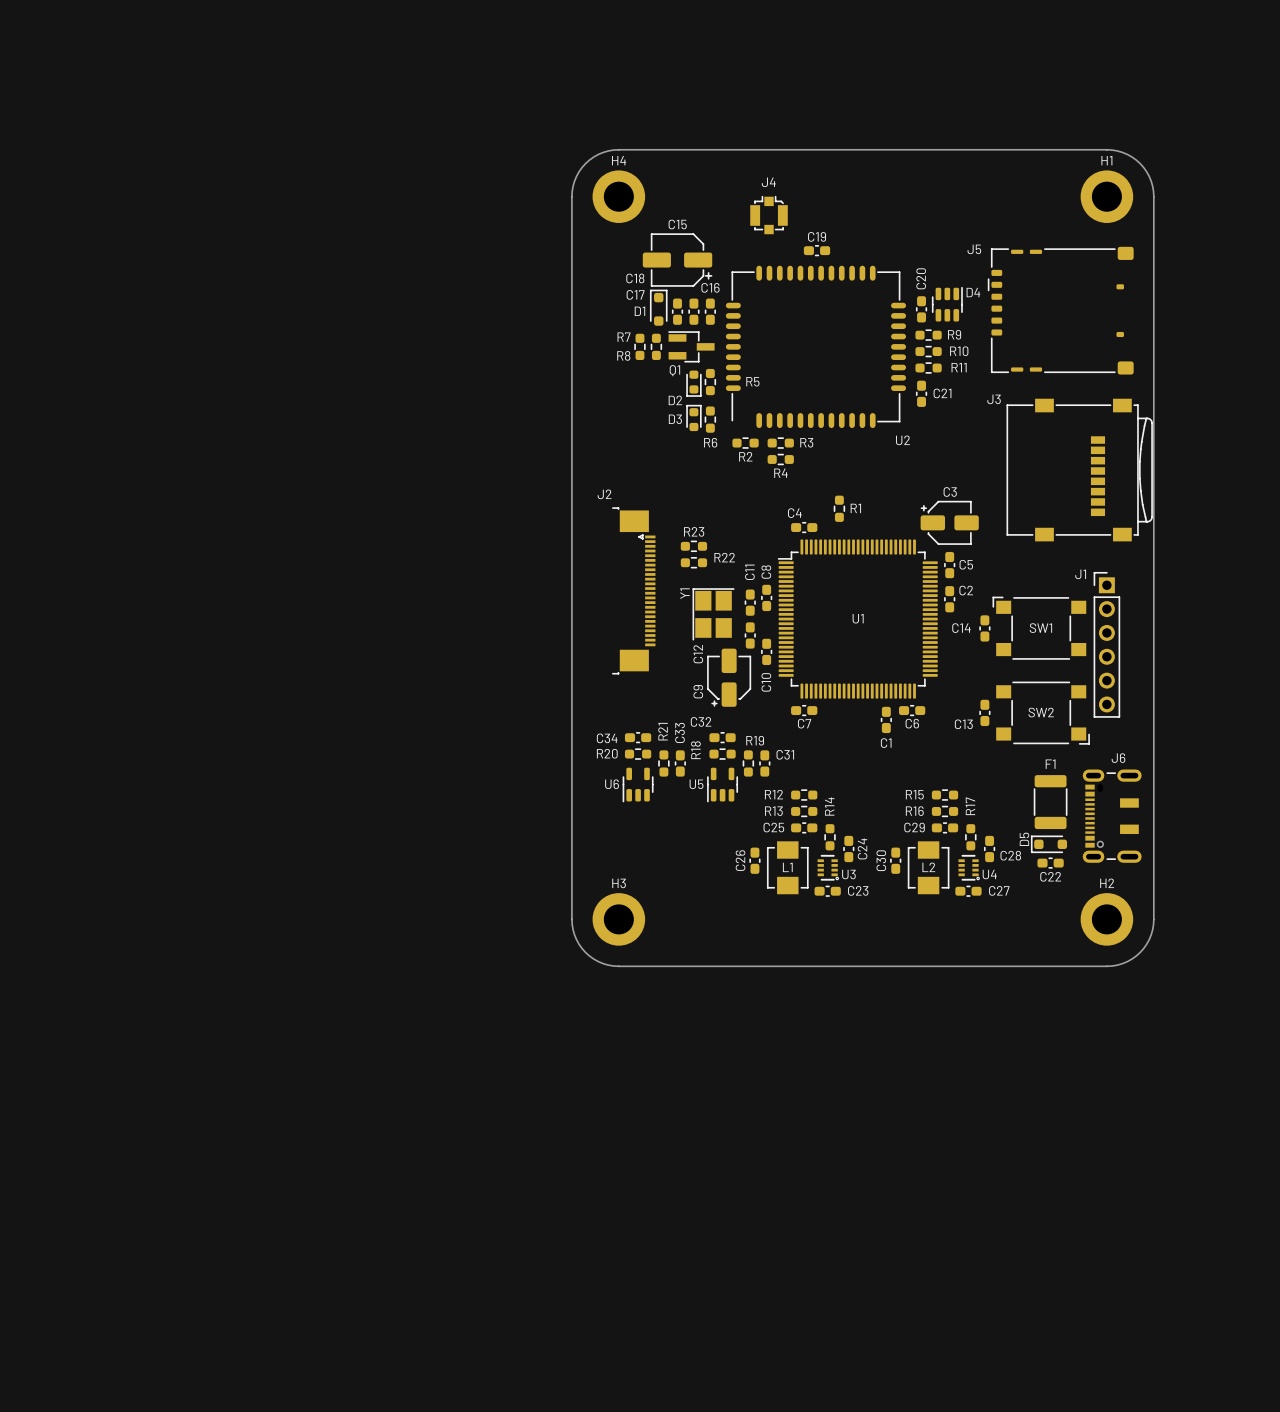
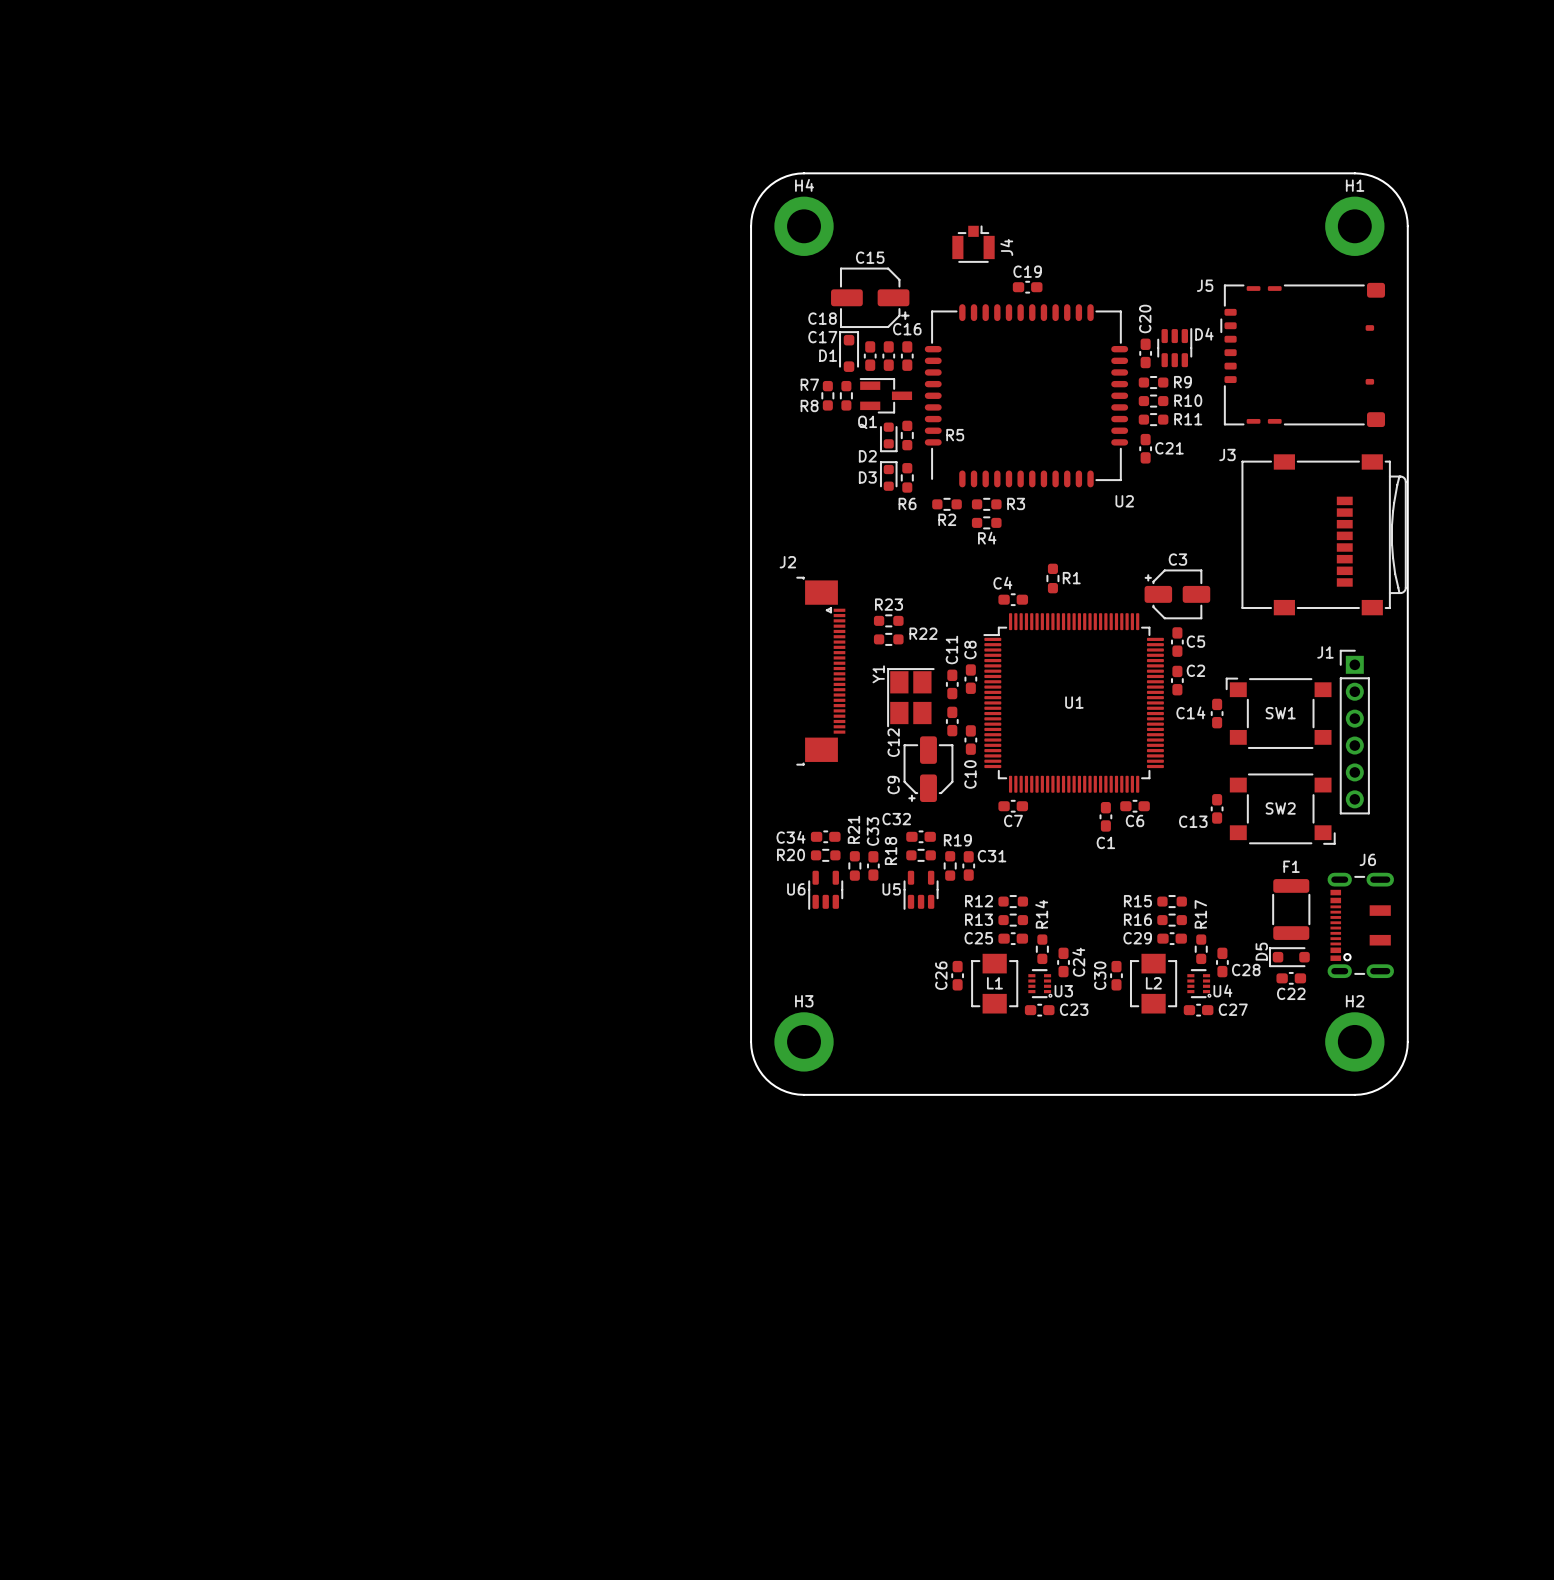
J4 name position: J4 (768, 182) -> J4 (1006, 247)
J4 footprint: [750, 196, 788, 235] -> [952, 225, 995, 263]

